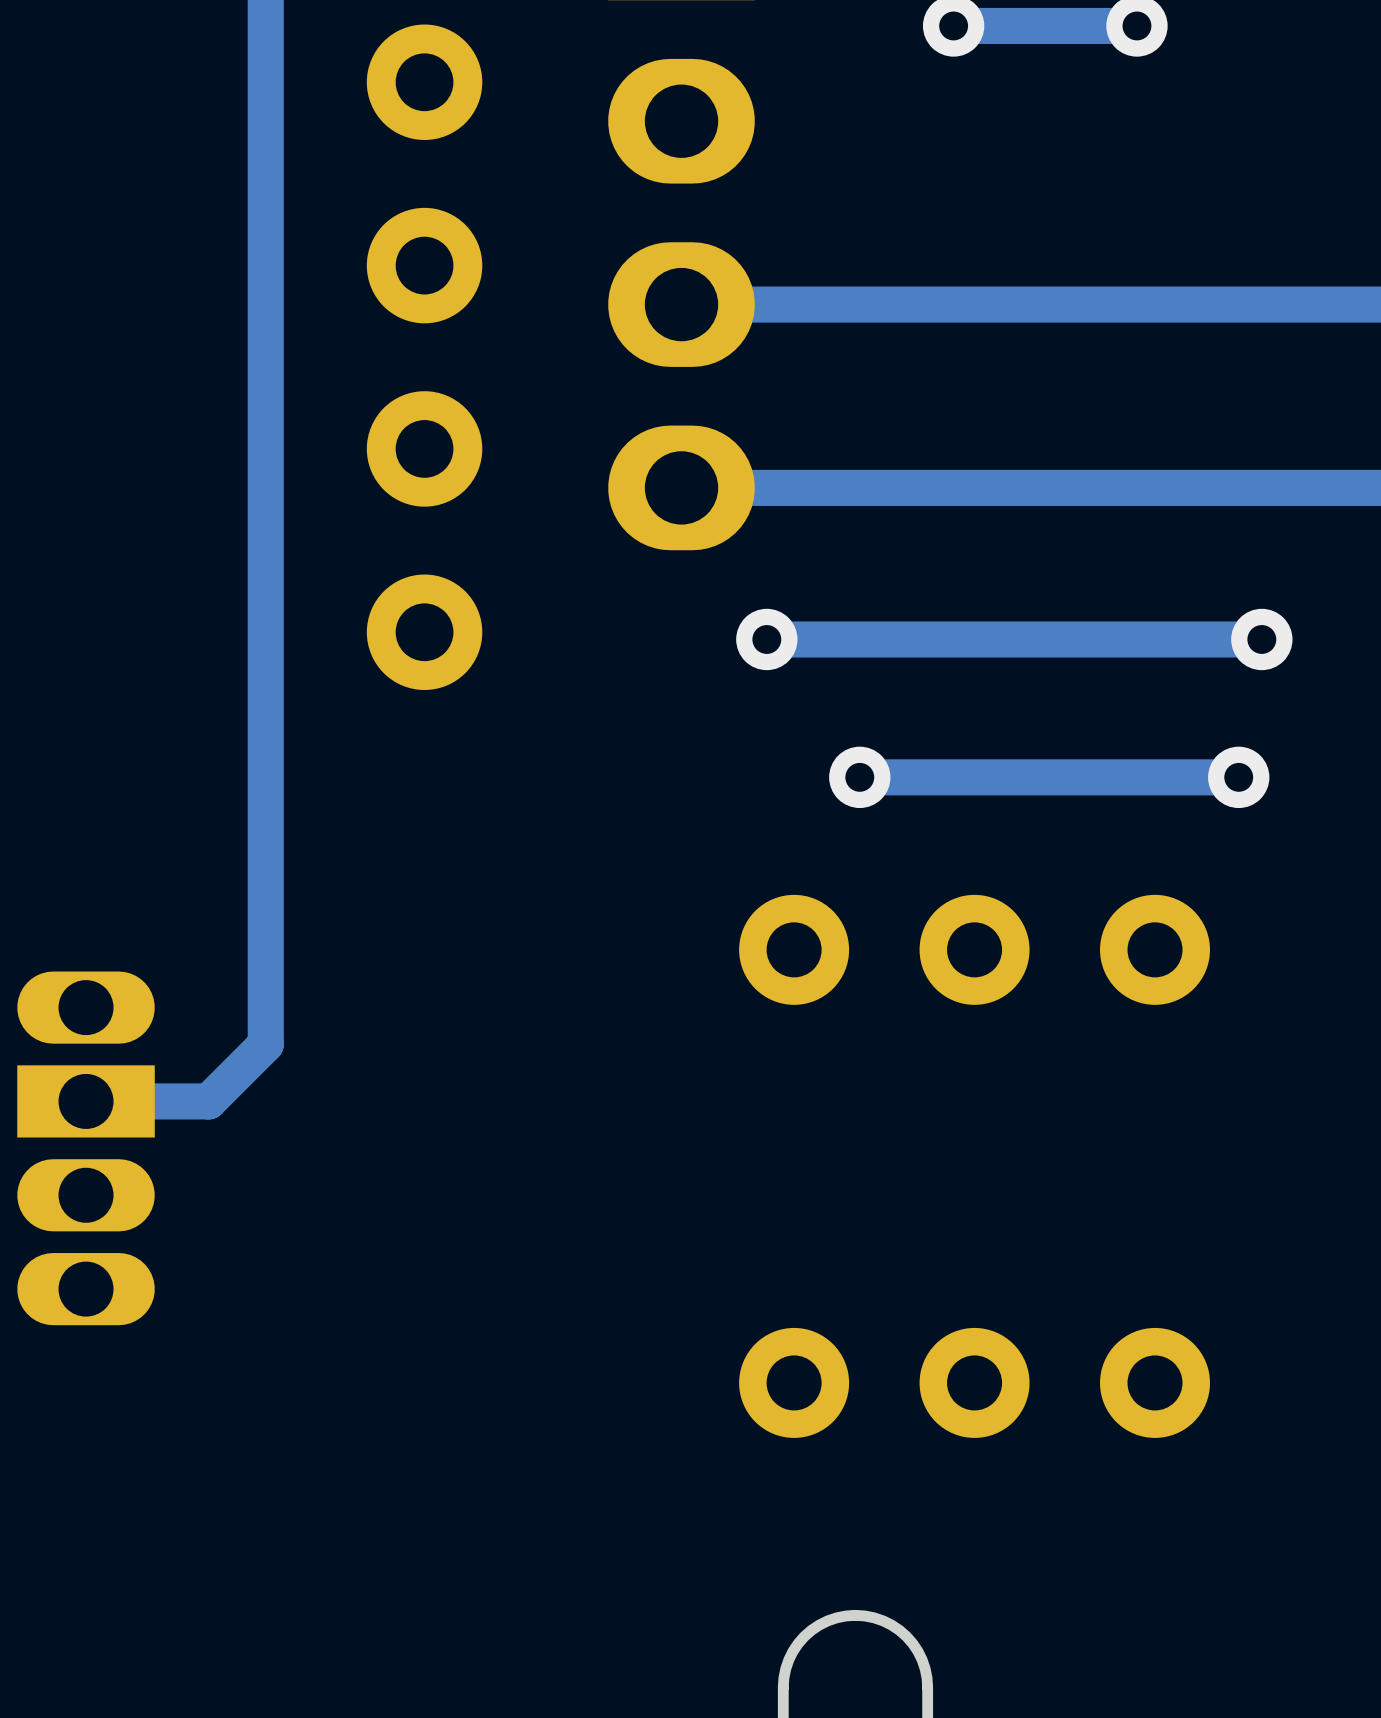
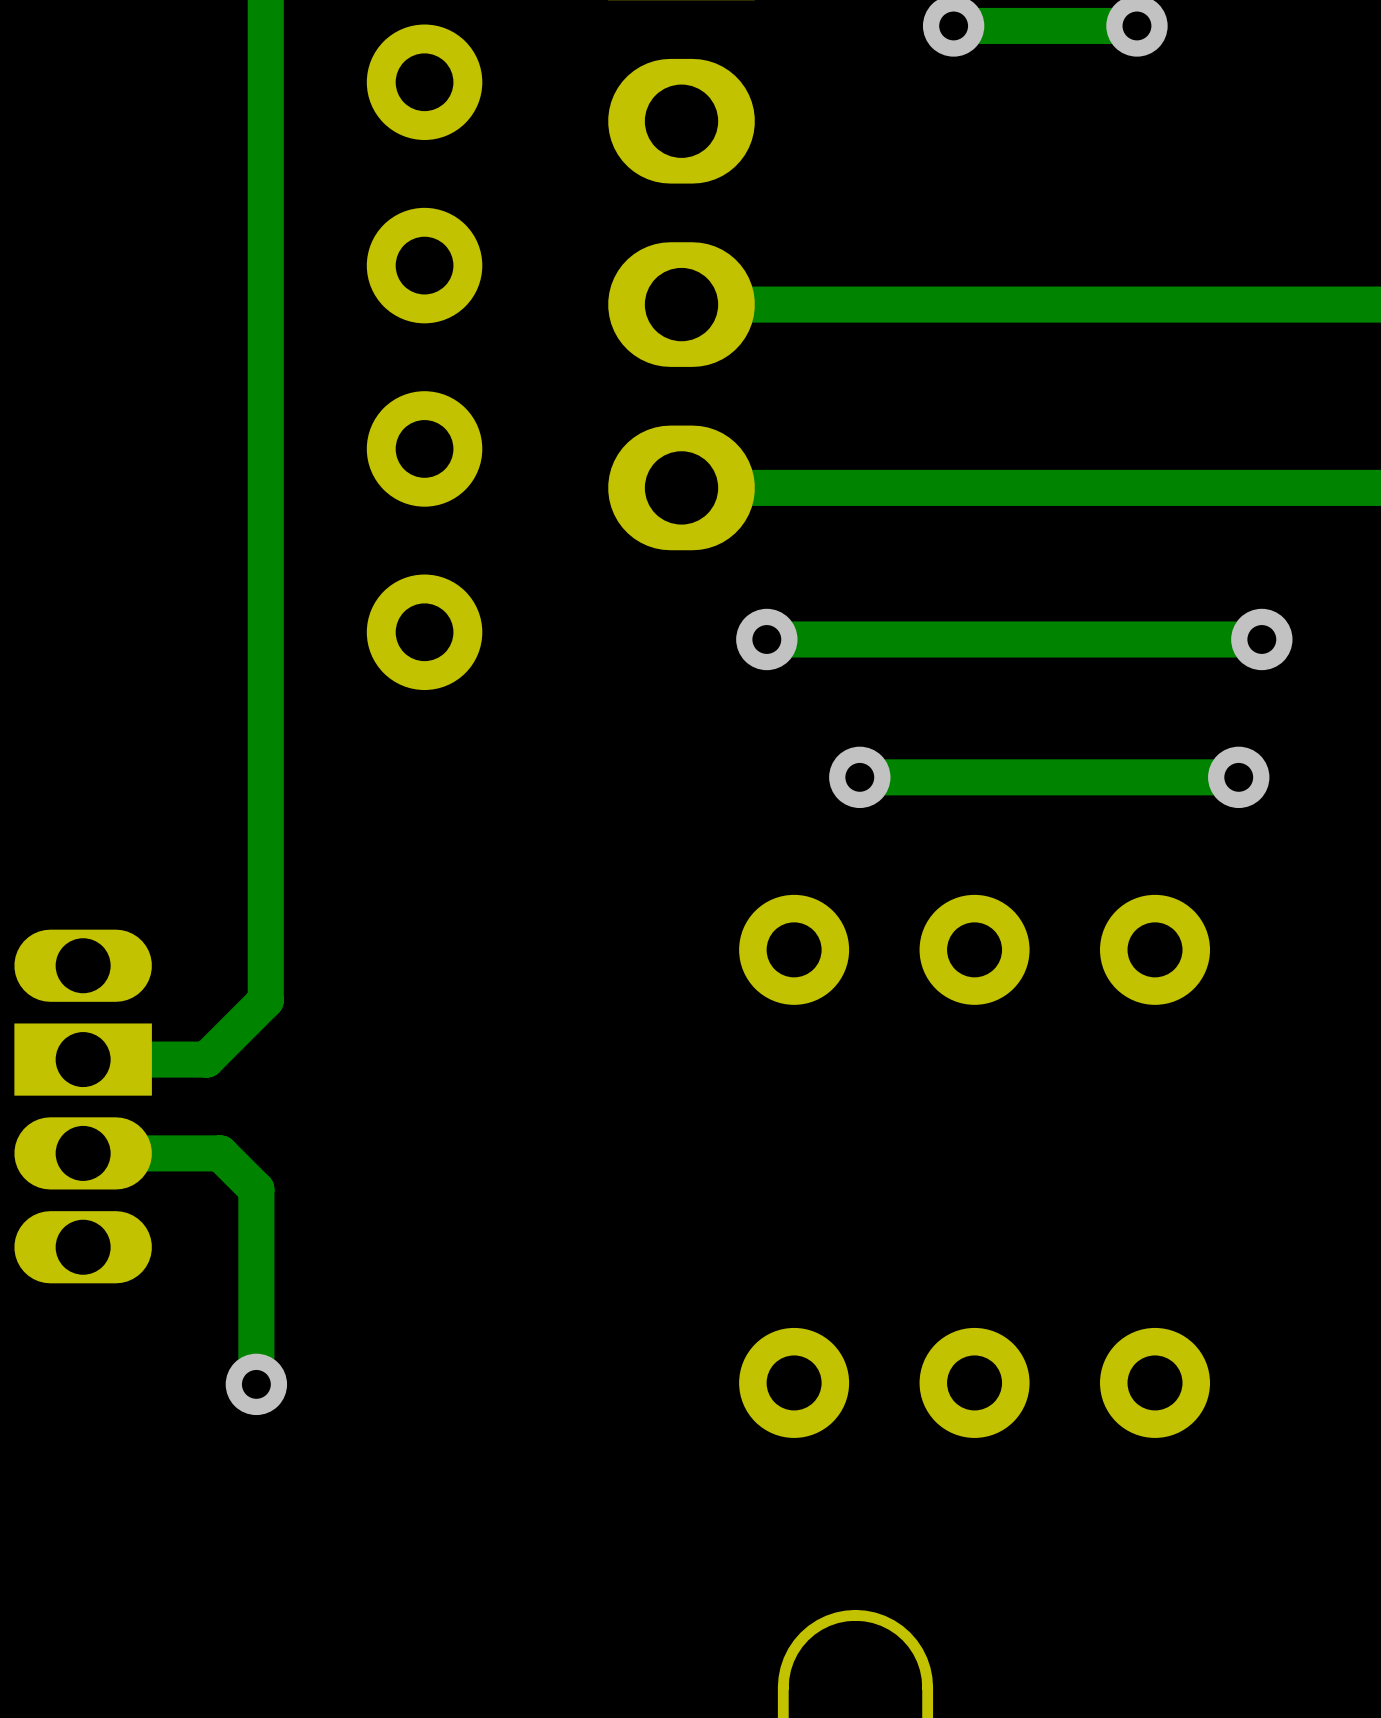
track: (265, 1000) (265, 1044) (208, 1101) (86, 1101) -> (265, 1000) (206, 1059) (83, 1059)
part position: (86, 1148) -> (83, 1106)
track: none -> (83, 1153) (220, 1153) (256, 1189) (256, 1384)
via: none -> (256, 1384)

